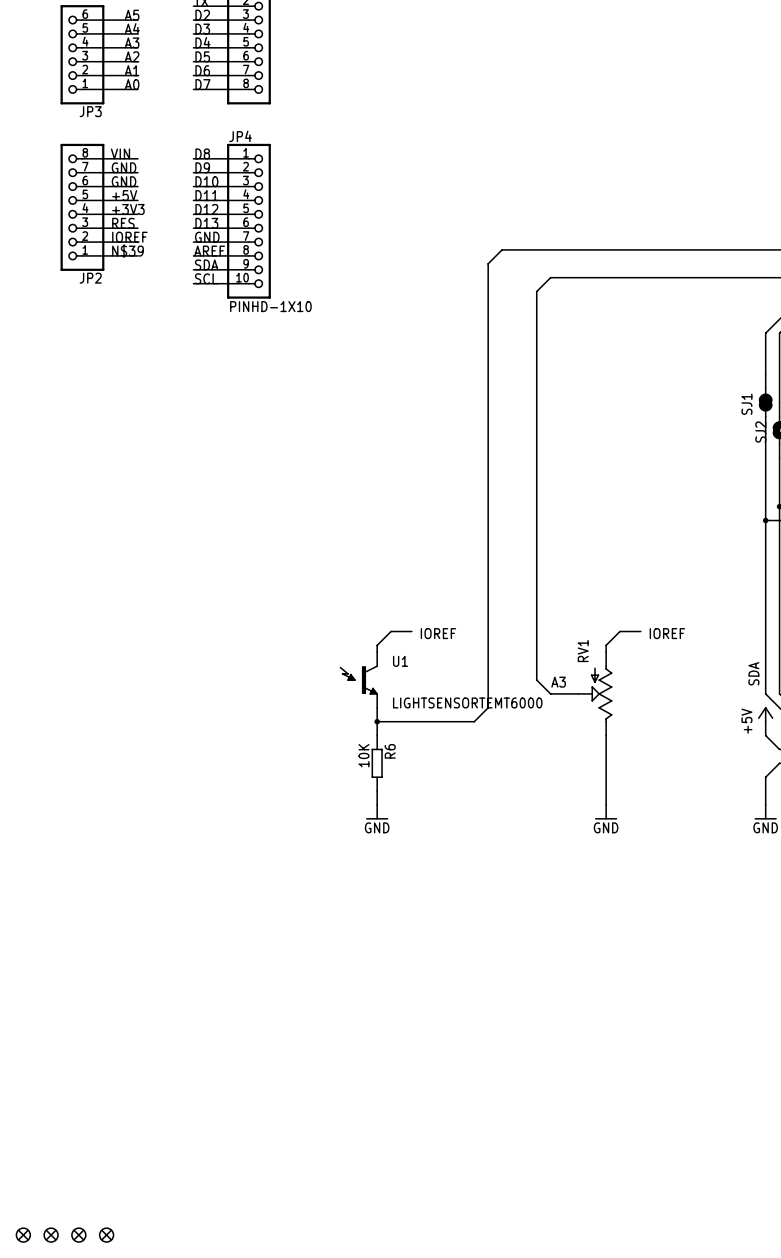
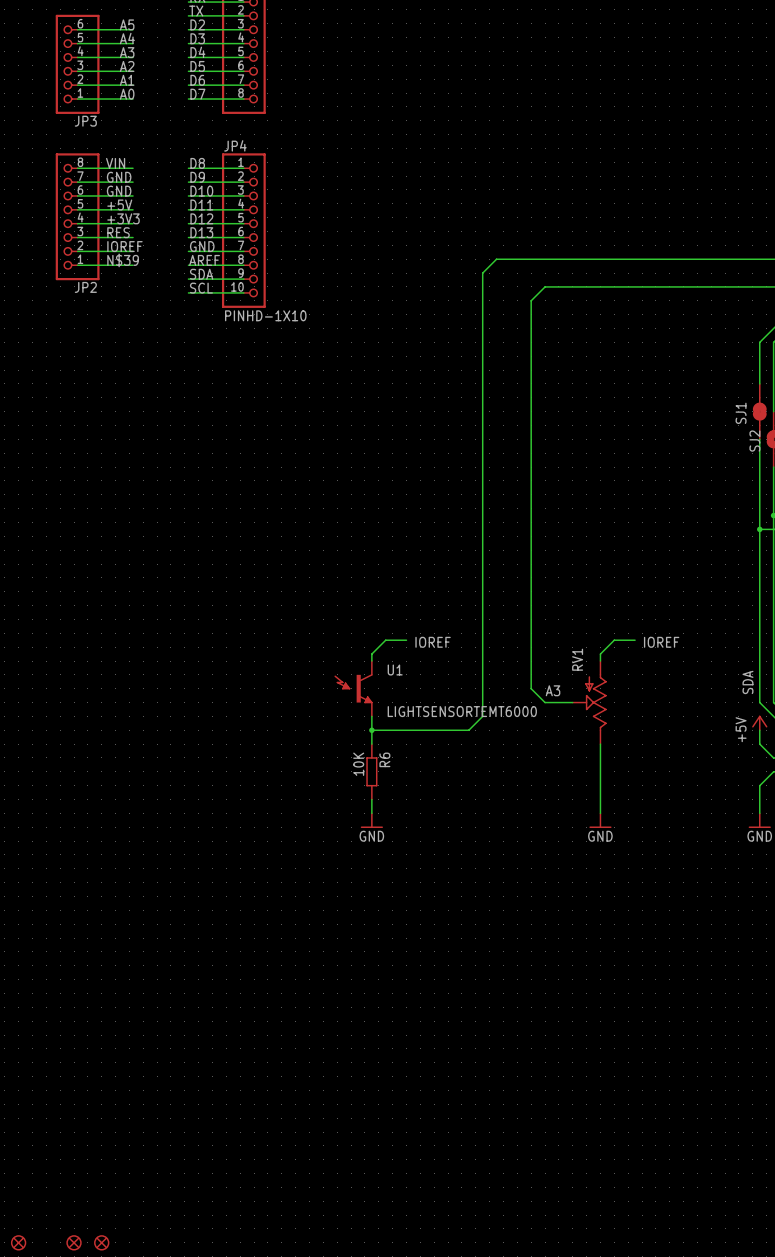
part: (51, 1235) -> none

